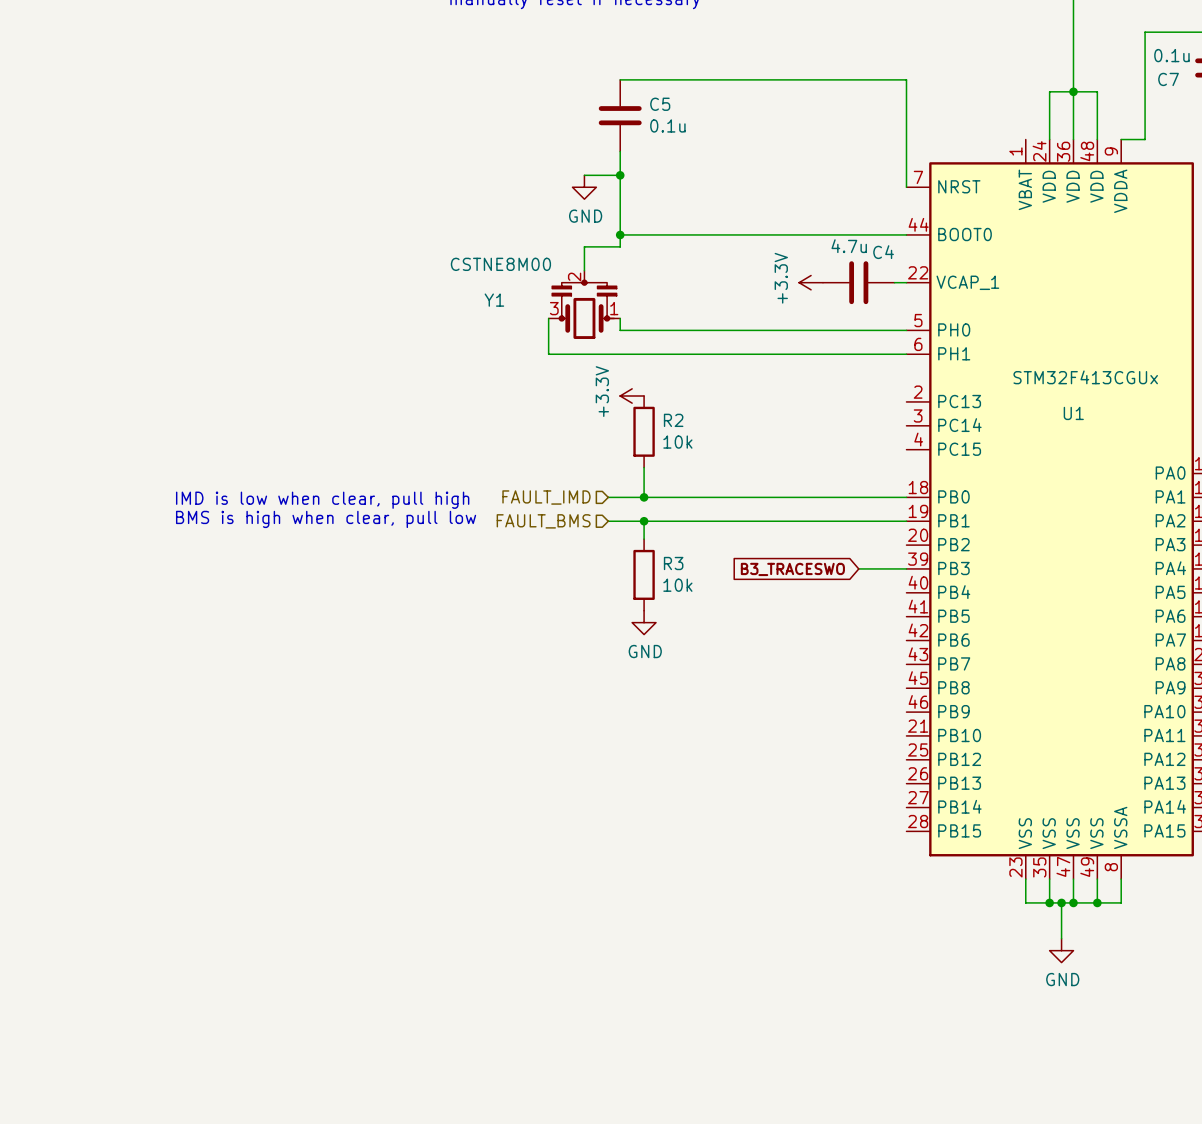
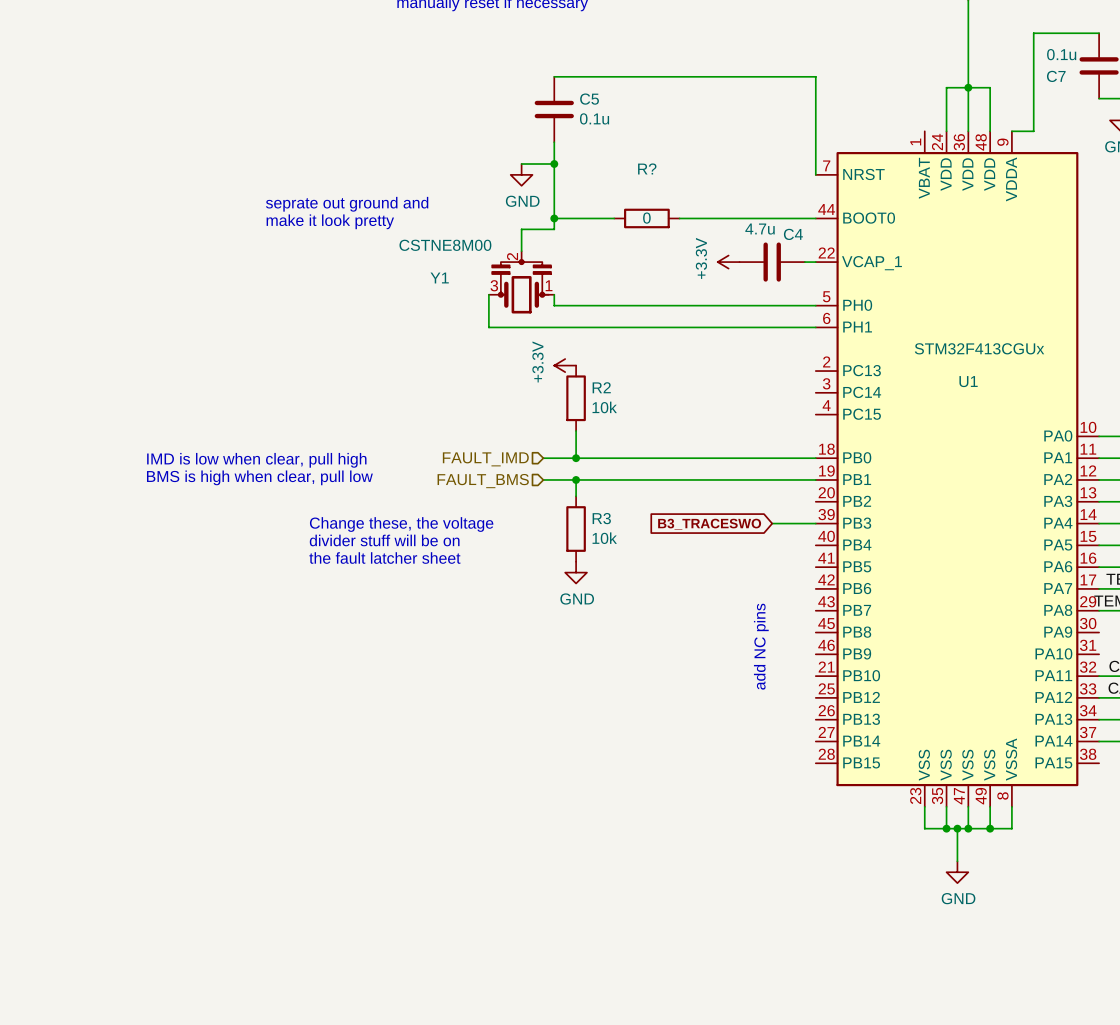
text: none -> seprate out ground and (347, 204)
wire: (685, 234) (757, 234) -> none
R?: none -> 0 (646, 218)
text: none -> make it look pretty (330, 221)
text: none -> Change these, the voltage (401, 524)
text: none -> divider stuff will be on (384, 540)
text: none -> the fault latcher sheet (384, 558)
text: none -> add NC pins (761, 646)

